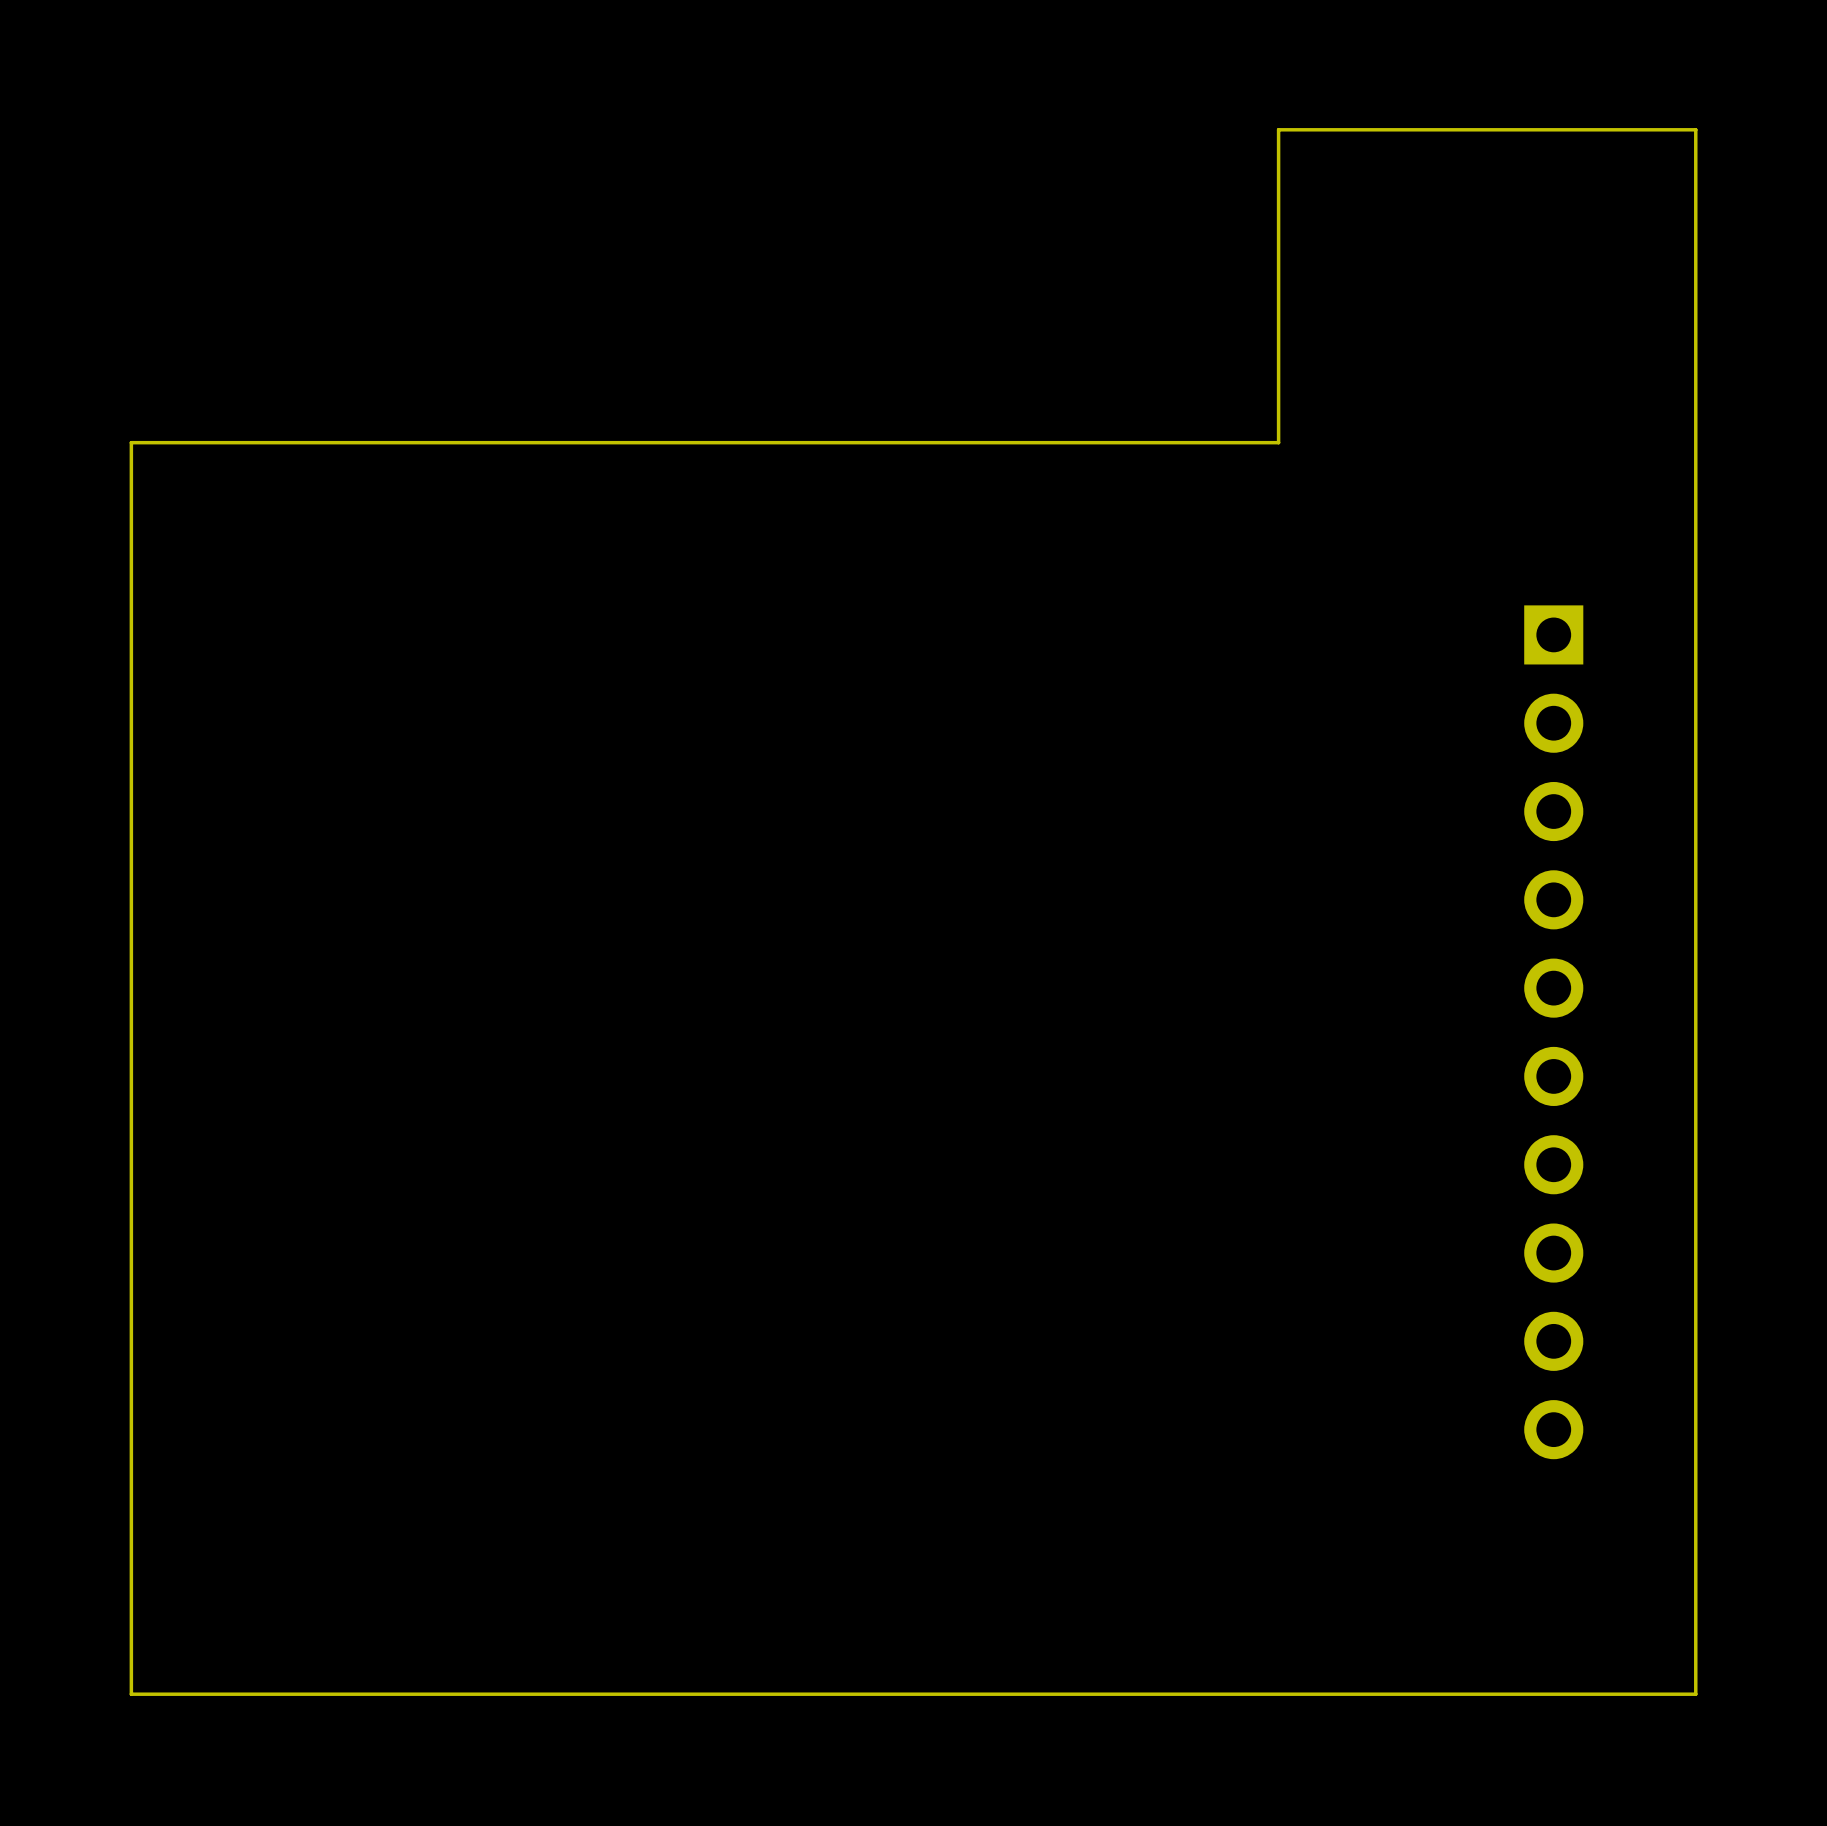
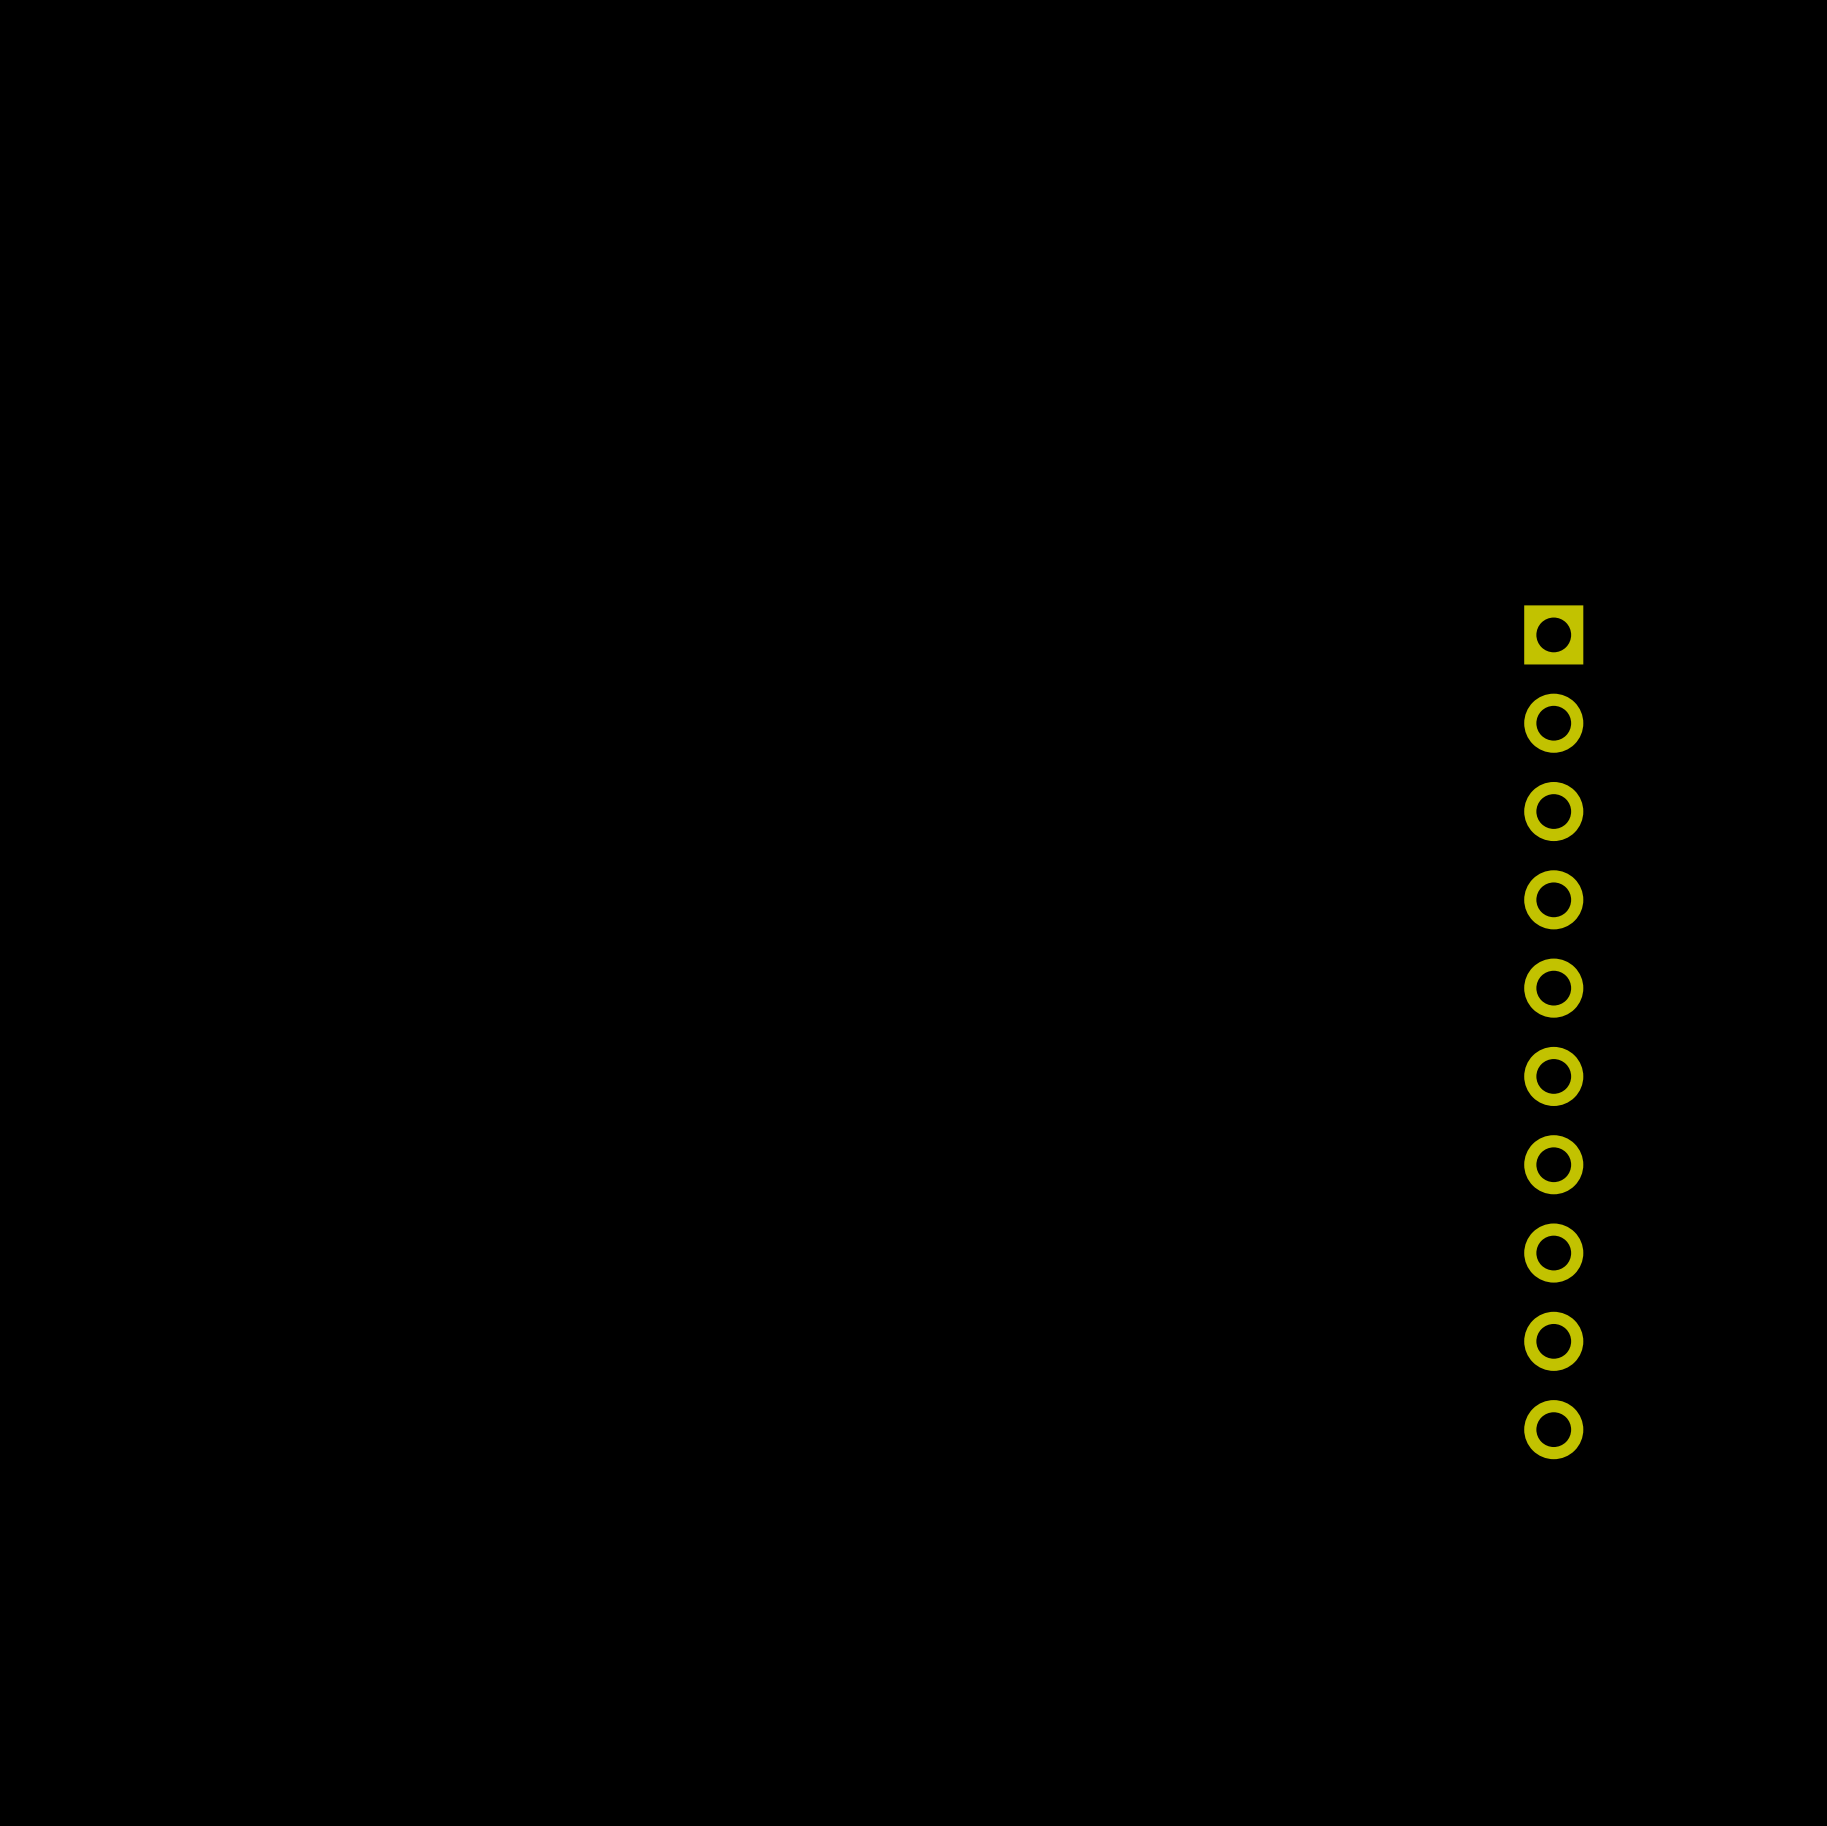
board edge: (1695, 129) (1695, 1694) (131, 1694) (131, 442) (1278, 442) (1278, 129) (1695, 129) -> none

